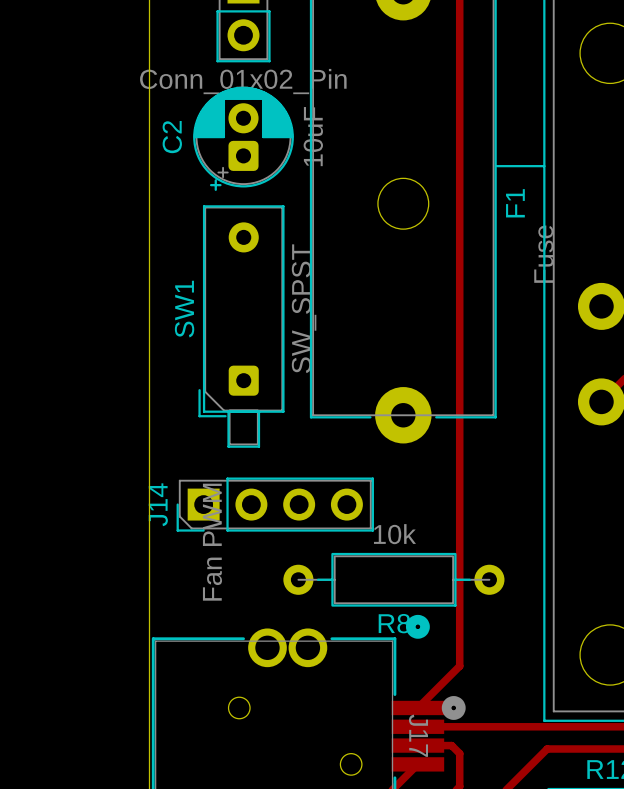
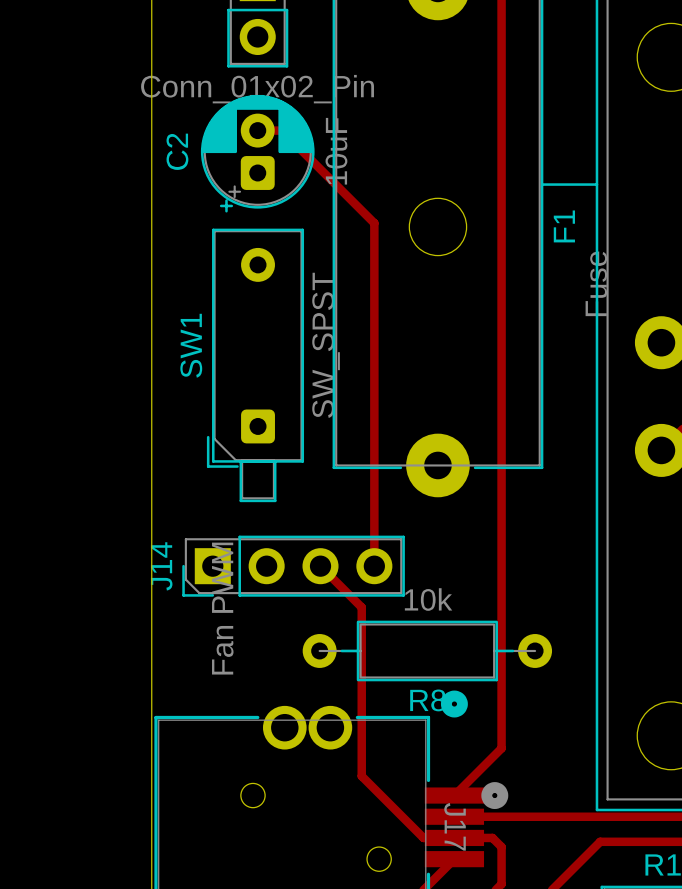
track: none -> (257, 130) (281, 130) (374, 223) (374, 566)
track: none -> (320, 566) (361, 607) (361, 776) (423, 837) (454, 837)

